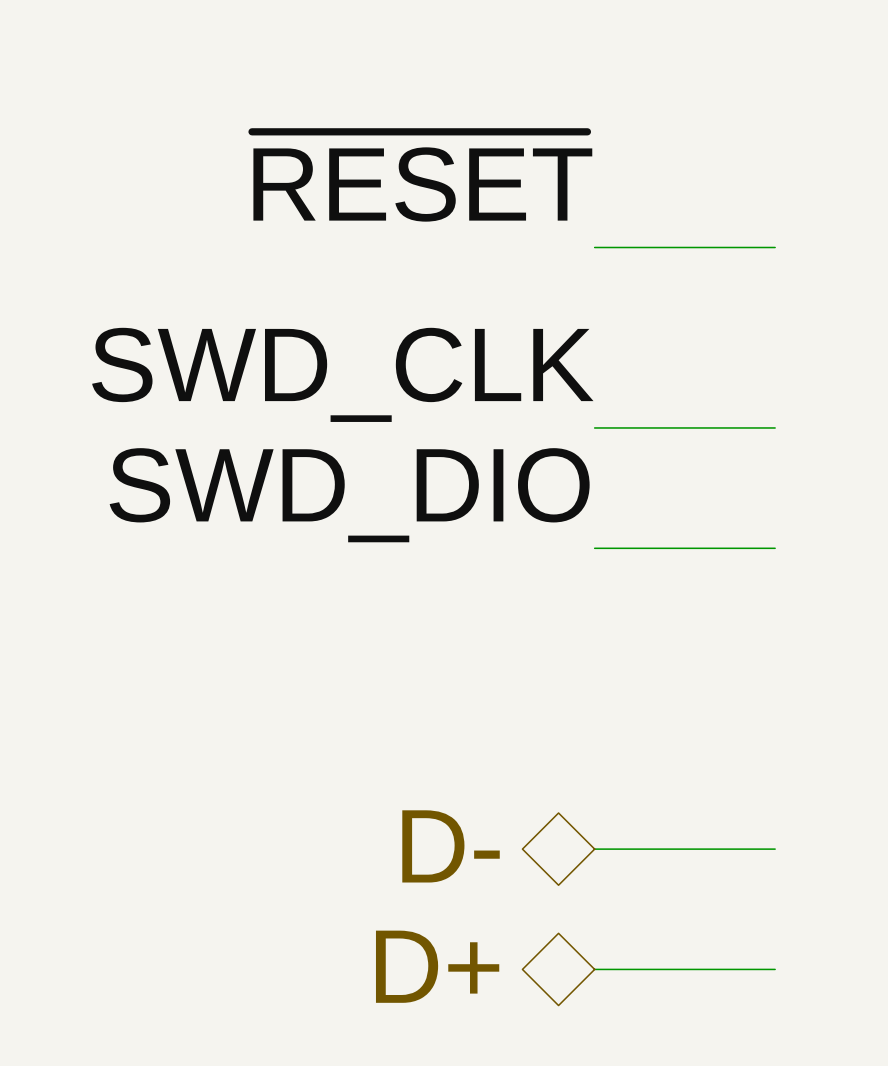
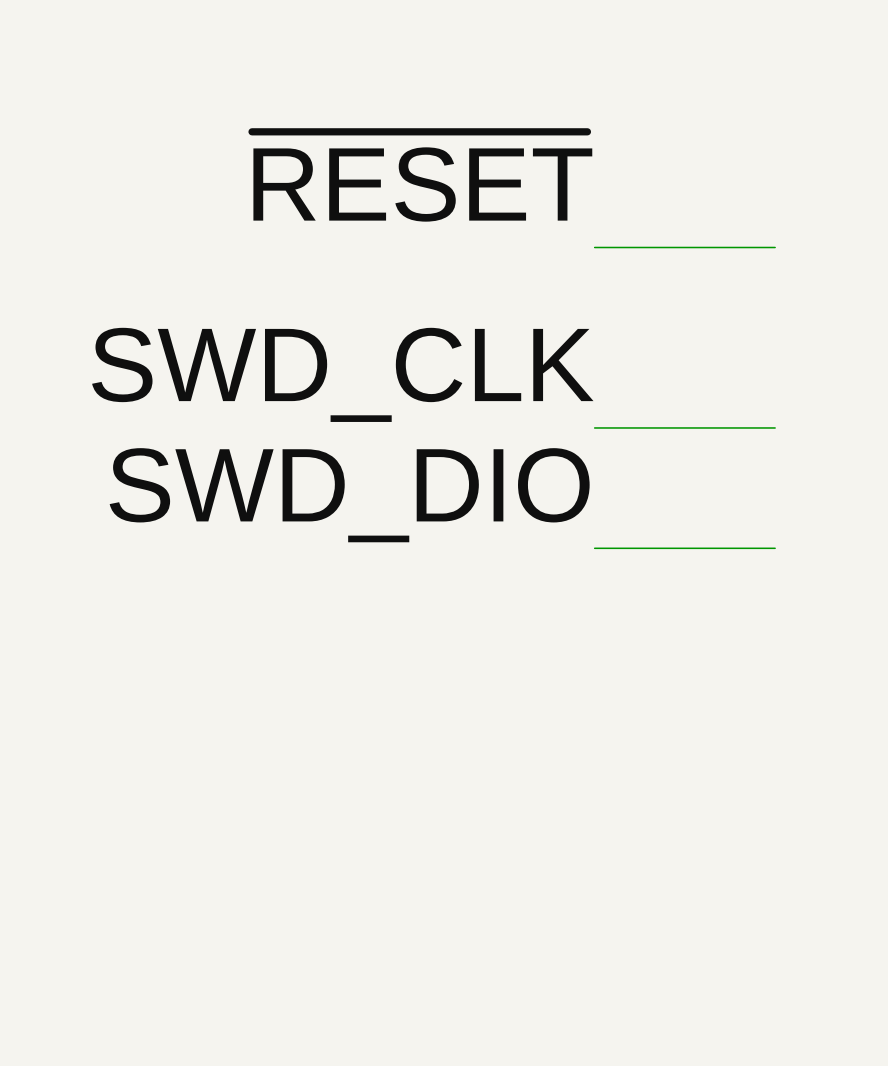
hierarchical label: D- (451, 846) -> none
wire: (594, 849) (775, 849) -> none
hierarchical label: D+ (437, 966) -> none
wire: (594, 969) (775, 969) -> none

